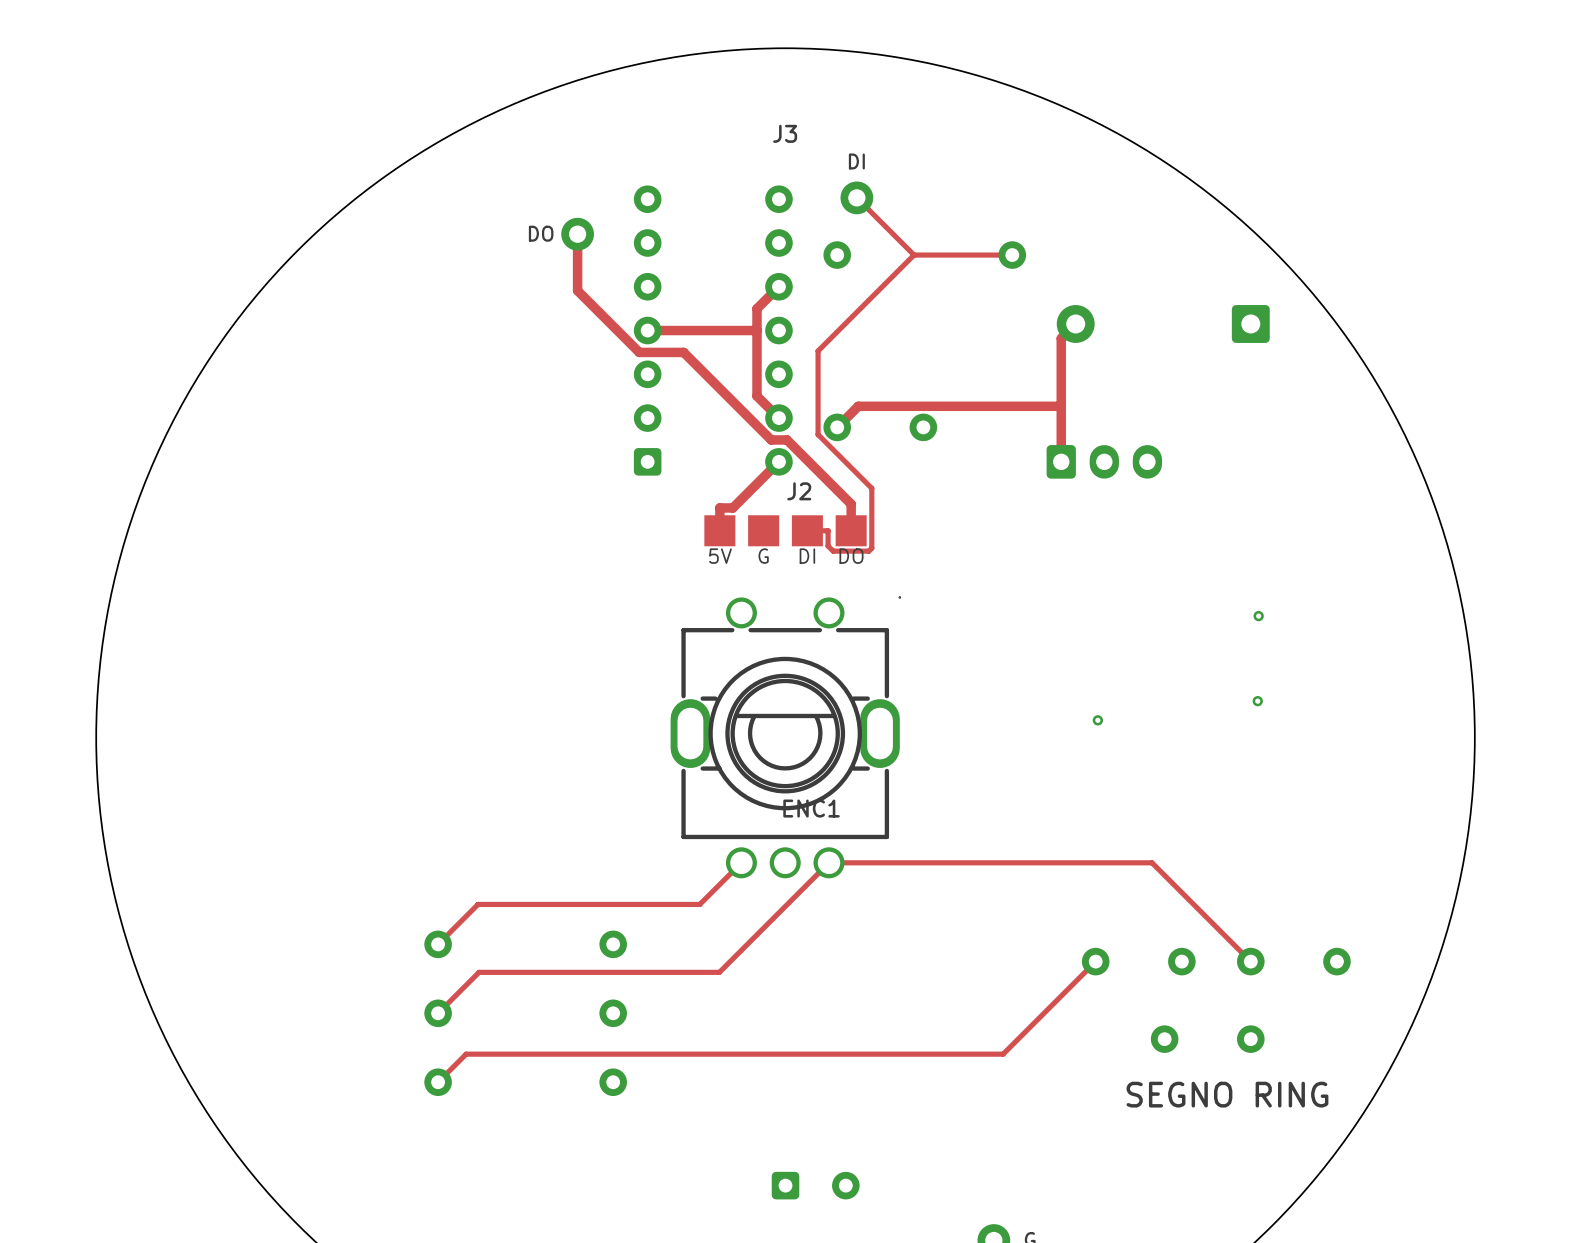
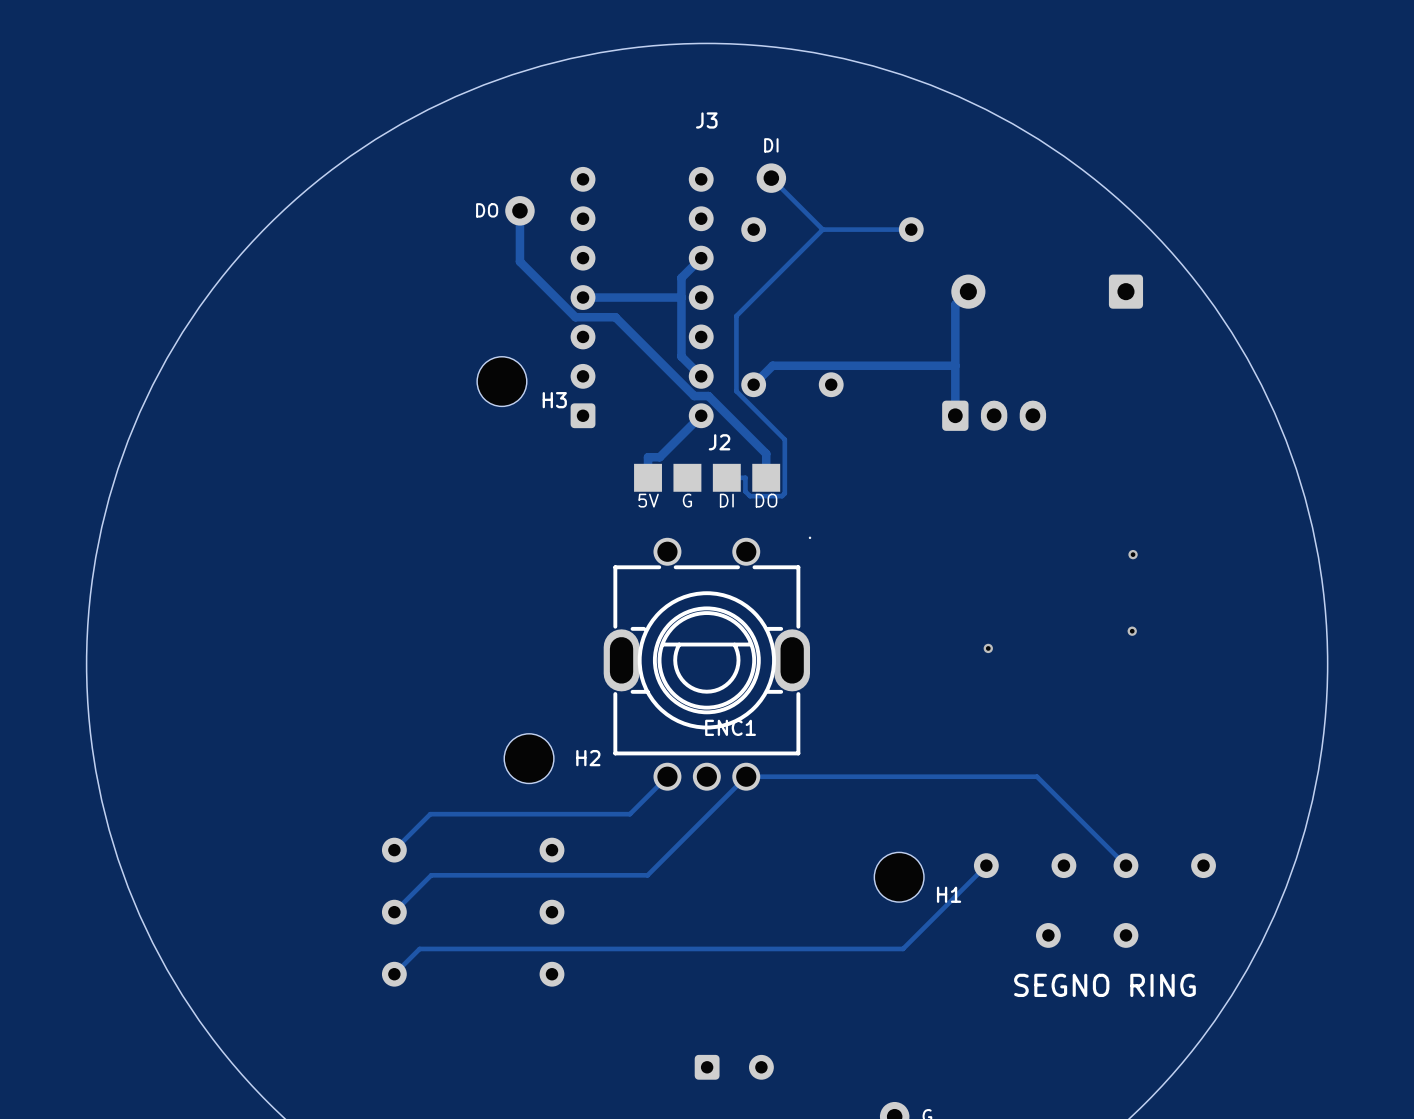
H3: none -> (501, 381)
H2: none -> (529, 758)
H1: none -> (899, 877)

